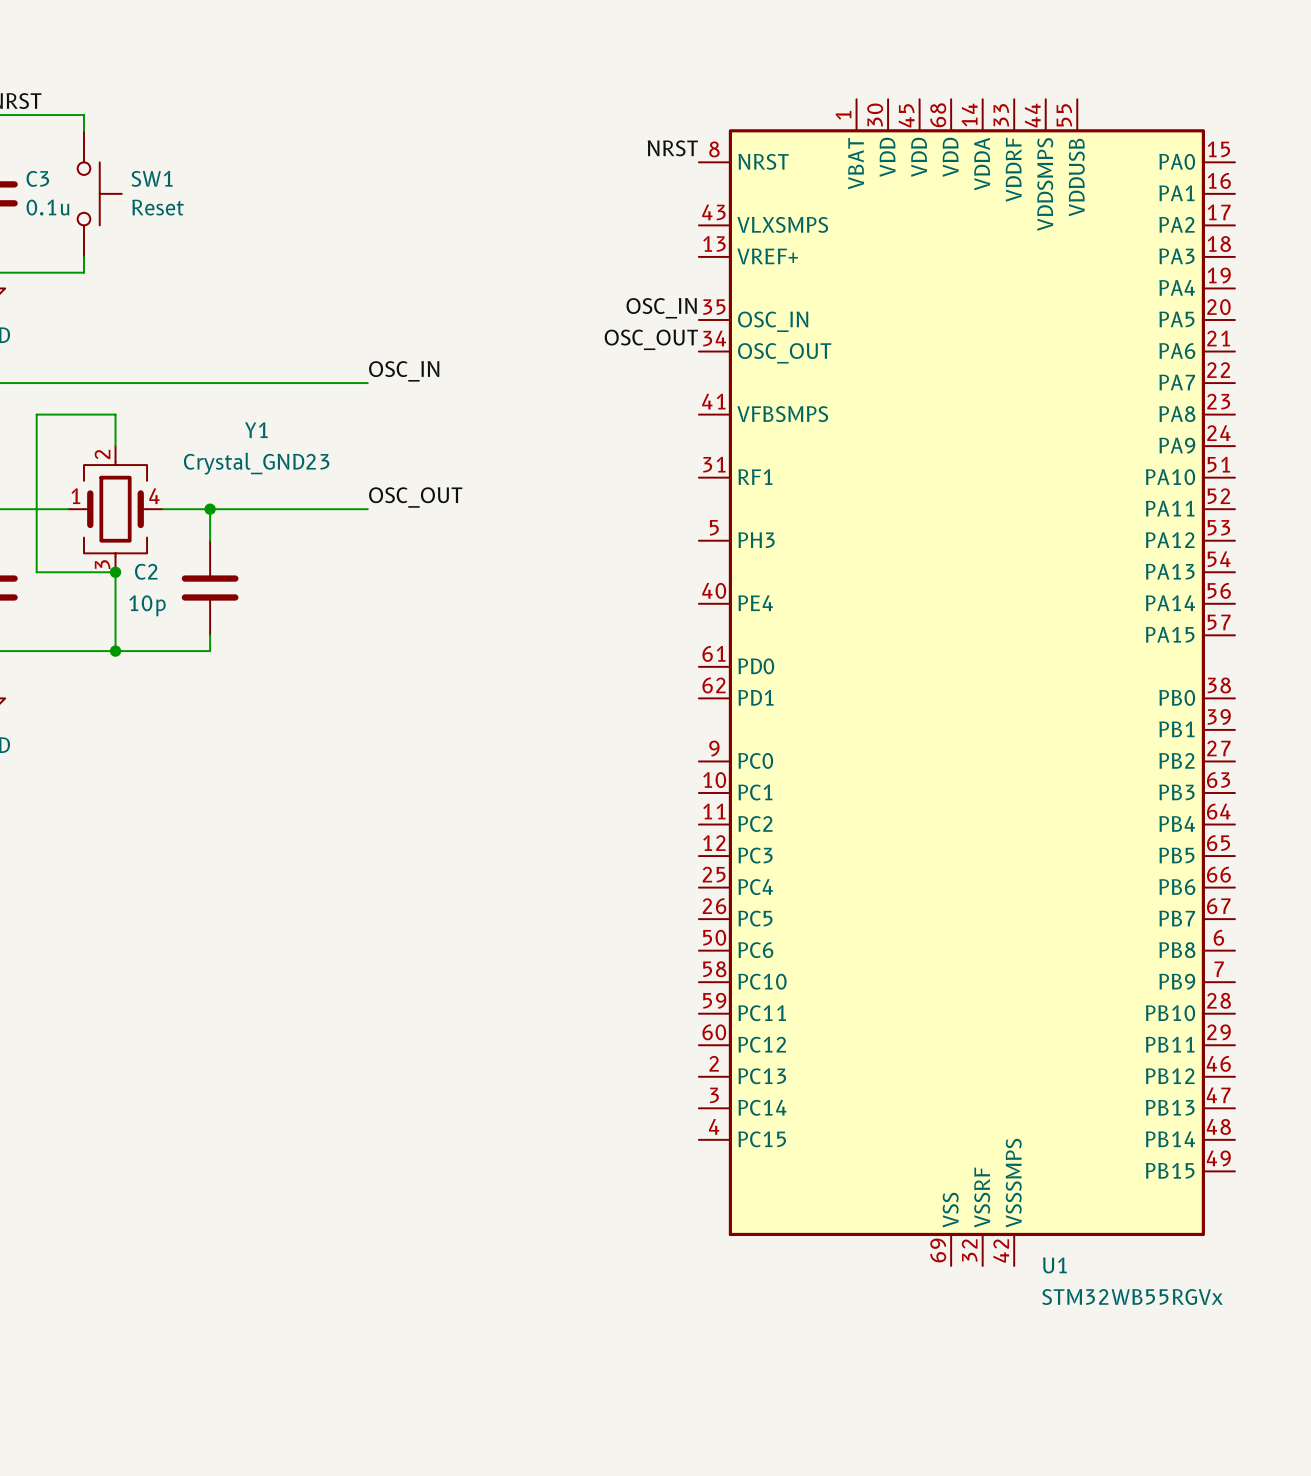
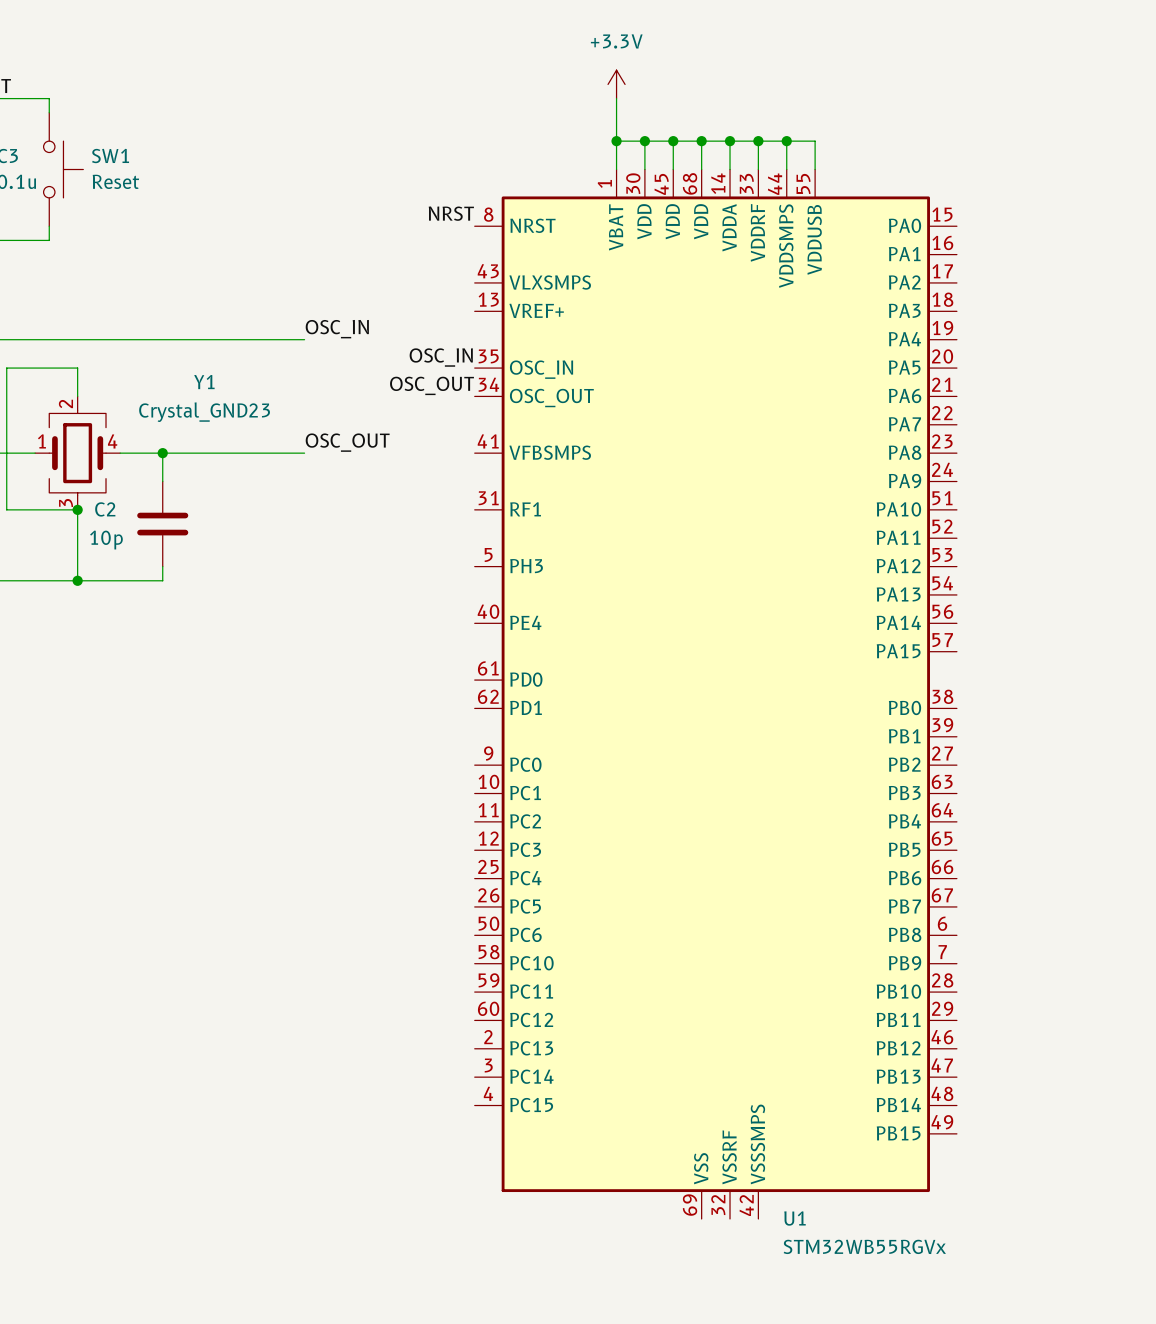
power symbol: none -> +3.3V (616, 84)
wire: none -> (616, 98) (616, 169)
label position: NRST (672, 148) -> NRST (451, 213)
junction: none -> (616, 141)
junction: none -> (644, 141)
junction: none -> (673, 141)
junction: none -> (701, 141)
junction: none -> (730, 141)
junction: none -> (758, 141)
junction: none -> (786, 141)
label position: OSC_IN (661, 308) -> OSC_IN (441, 357)
label position: OSC_OUT (651, 339) -> OSC_OUT (431, 385)
U1 position: (966, 682) -> (715, 694)

